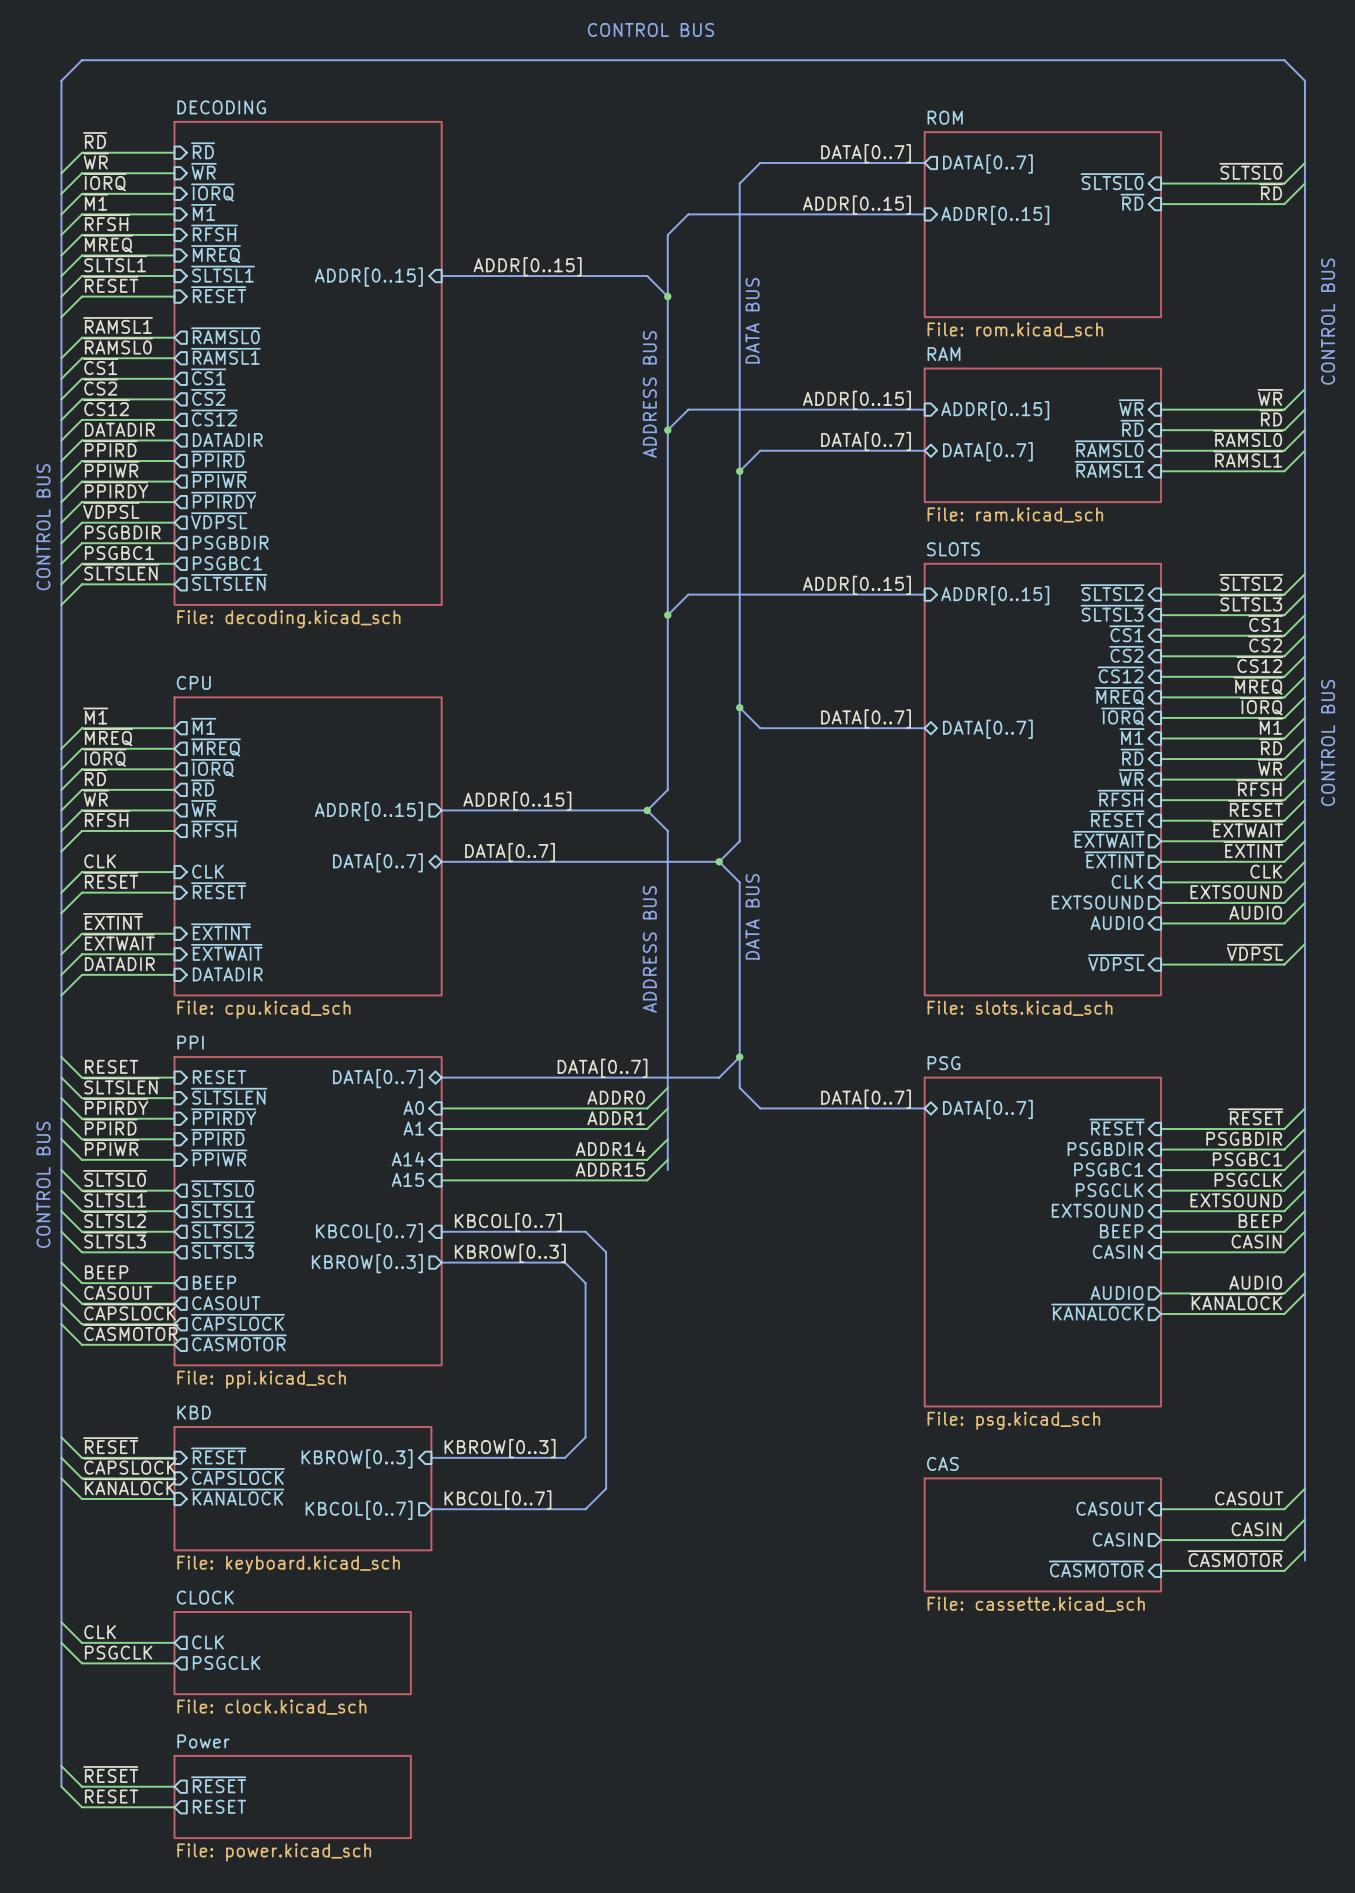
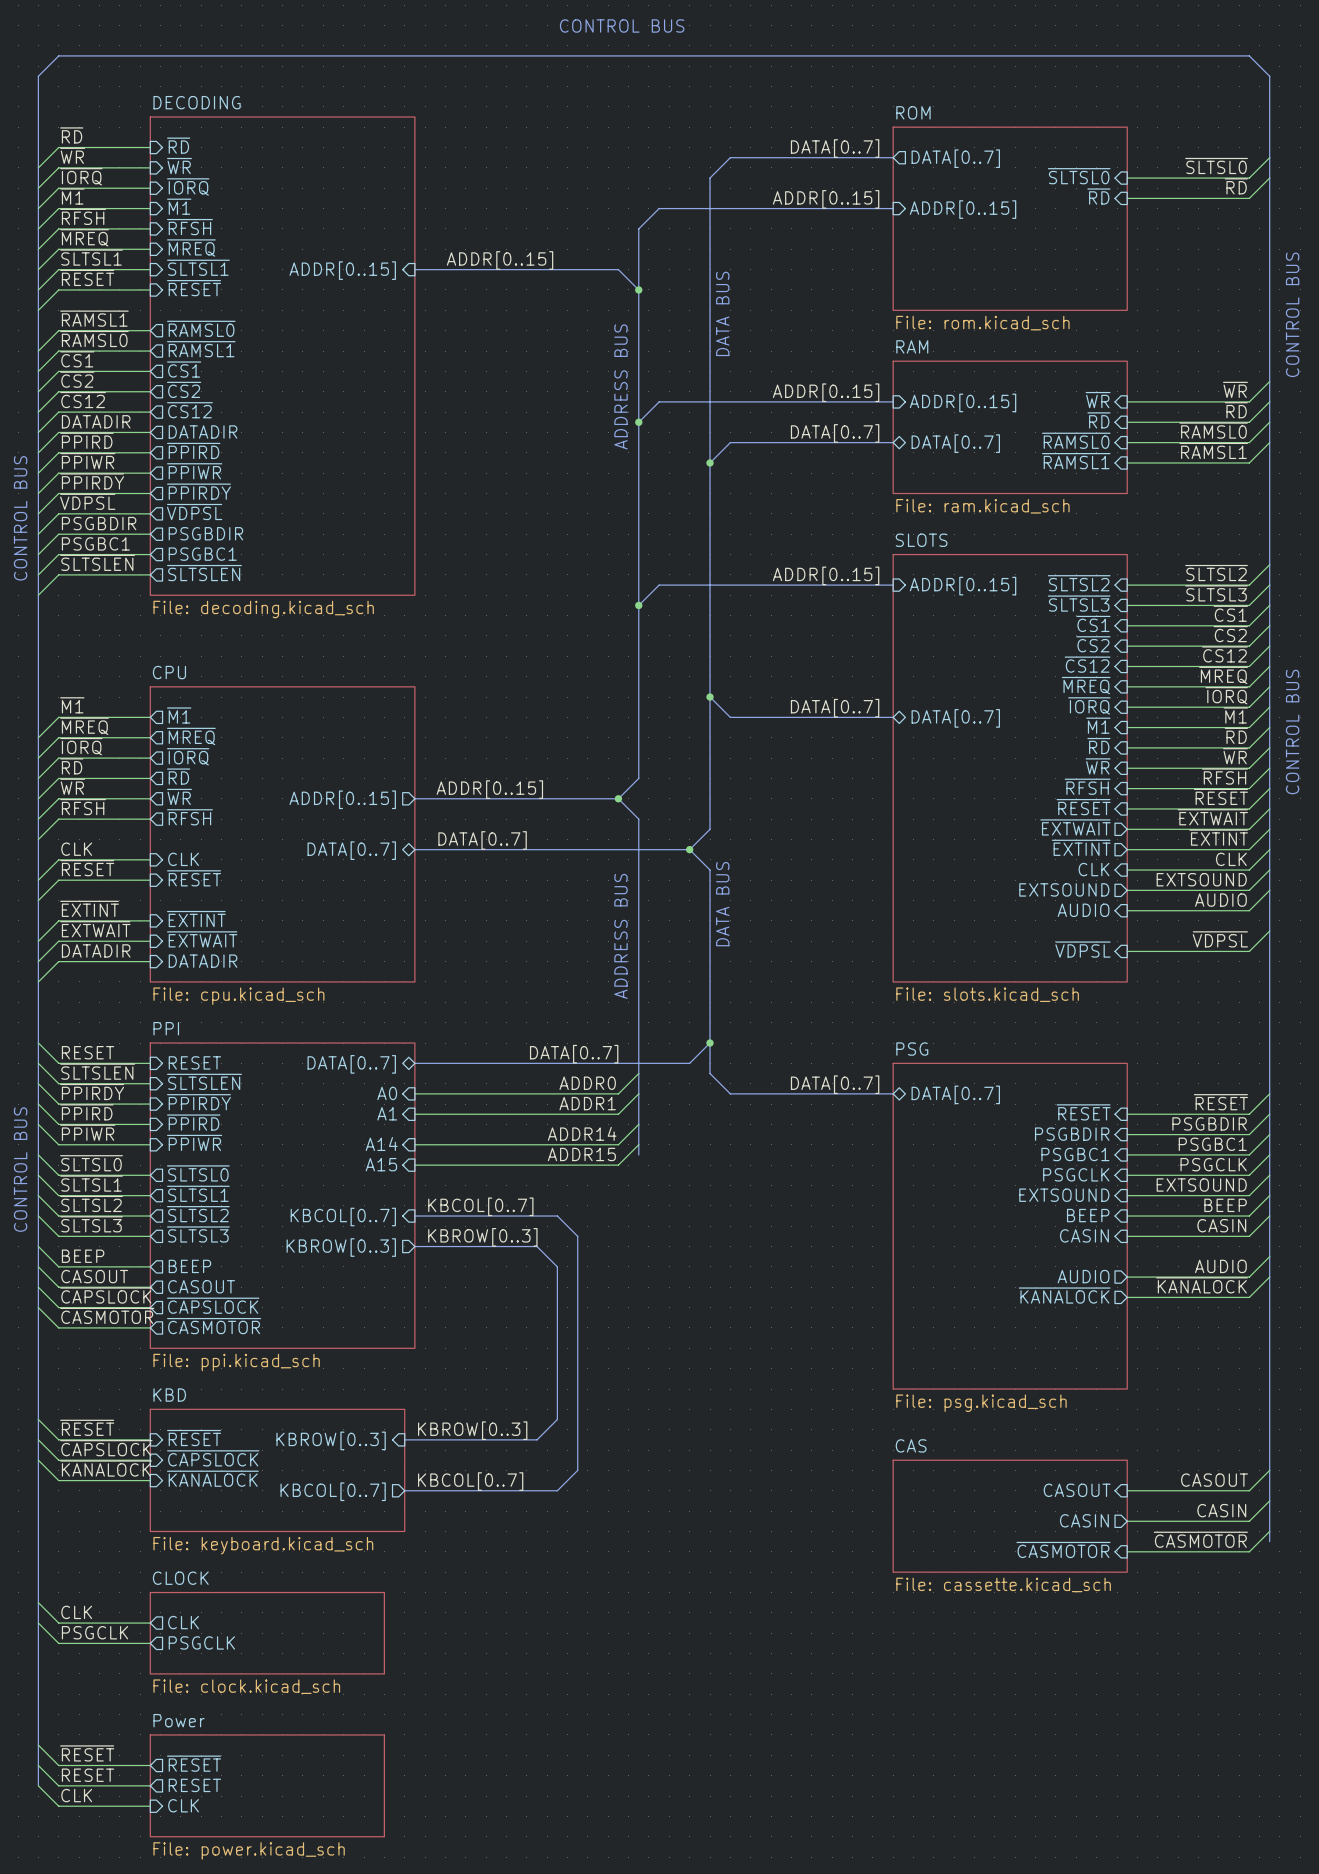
bus: none -> (38, 1765) (38, 1785)
sheet Power: File: power.kicad_sch (292, 1796) -> none
wire: none -> (38, 1785) (58, 1806) (150, 1806)
sheet Power: none -> File: power.kicad_sch (267, 1785)
label: none -> CLK (76, 1795)
sheet pin: none -> CLK (183, 1805)

